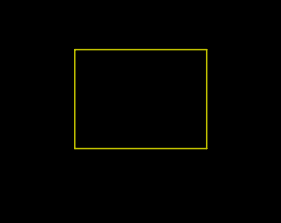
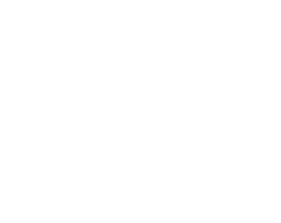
board edge: (206, 49) (74, 49) (74, 148) (206, 148) (206, 49) -> none

